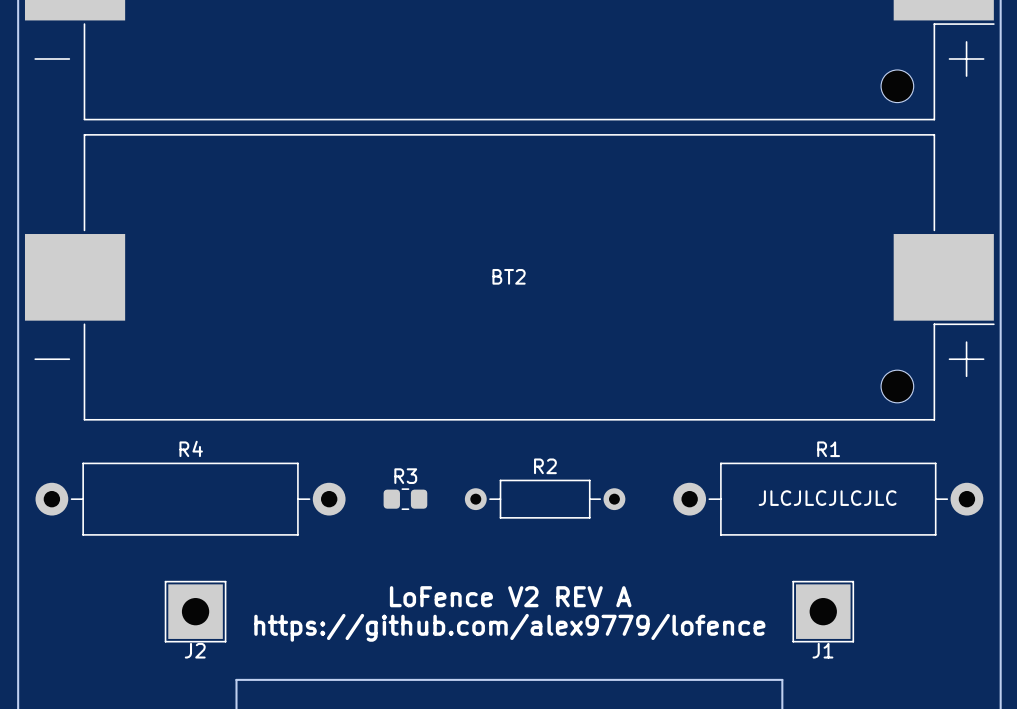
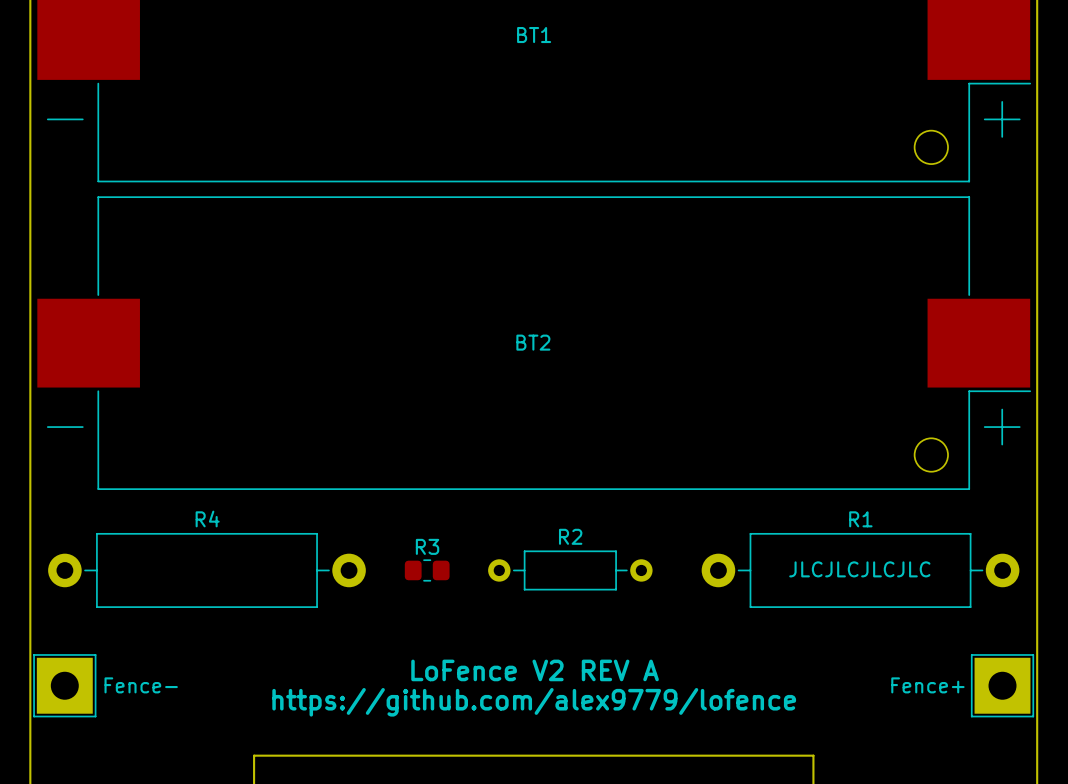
part: none -> Fence- (64, 685)
J2: (195, 611) -> none
J1: (823, 611) -> none
part: none -> Fence+ (1002, 685)

